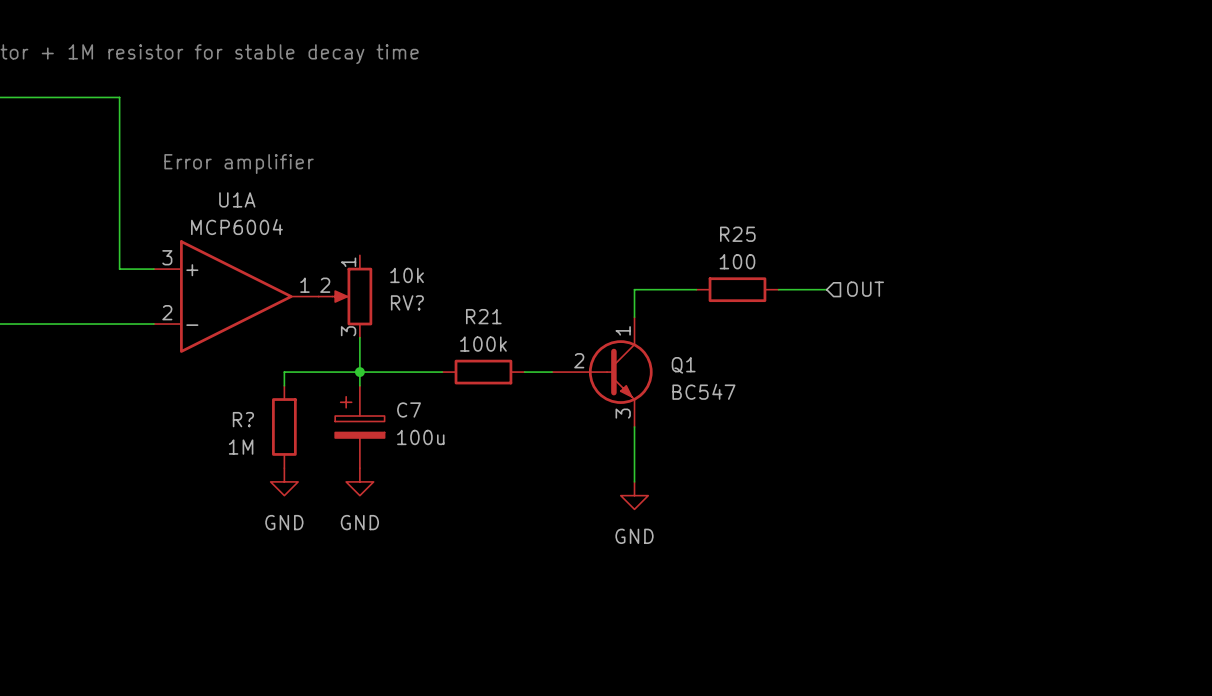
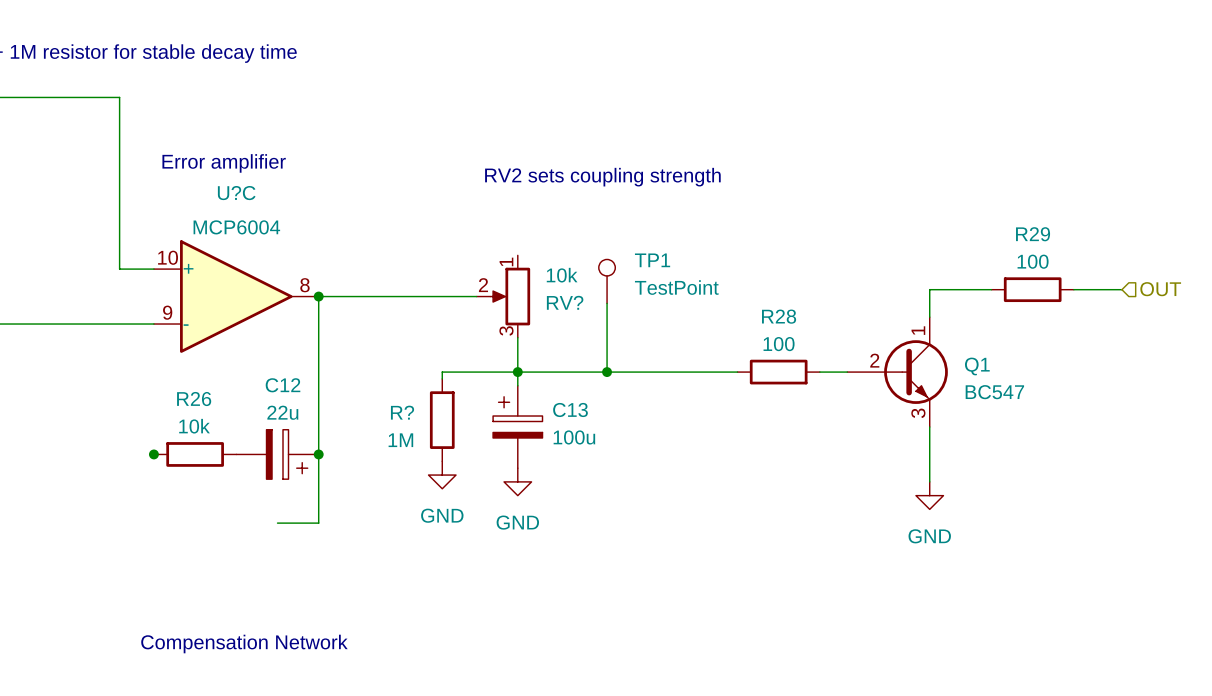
text: none -> RV2 sets coupling strength (602, 177)
U1A name: U1A (237, 199) -> U?C (236, 193)
U1A pin number: 3 (167, 257) -> 10 (168, 257)
TP1: none -> TestPoint (607, 281)
U1A pin number: 1 (304, 285) -> 8 (304, 285)
wire: (696, 289) (634, 289) (634, 317) -> none
R25: 100 (737, 289) -> none
wire: (778, 289) (826, 289) -> none
hierarchical label: OUT (865, 289) -> none
wire: none -> (991, 289) (929, 289) (929, 317)
R29: none -> 100 (1032, 289)
wire: none -> (1073, 289) (1121, 289)
hierarchical label: none -> OUT (1160, 289)
junction: none -> (318, 296)
RV? position: (345, 296) -> (503, 296)
wire: none -> (476, 296) (318, 296) (318, 523) (277, 523)
wire: none -> (607, 303) (607, 372)
U1A pin number: 2 (167, 312) -> 9 (167, 312)
wire: (359, 337) (359, 385) -> (517, 337) (517, 385)
junction: (359, 372) -> none
wire: (442, 372) (284, 372) (284, 385) -> none
R21: 100k (483, 372) -> none
junction: none -> (517, 372)
wire: none -> (524, 372) (442, 372) (442, 378)
wire: none -> (552, 372) (737, 372)
Q1 position: (602, 372) -> (897, 372)
junction: none -> (607, 372)
R28: none -> 100 (778, 372)
wire: none -> (819, 372) (847, 372)
R? position: (284, 426) -> (442, 420)
C7: 100u (359, 426) -> none
C13: none -> 100u (517, 426)
wire: (634, 426) (634, 481) -> none
wire: none -> (929, 426) (929, 481)
junction: none -> (153, 454)
R26: none -> 10k (195, 454)
C12: none -> 22u (277, 454)
junction: none -> (318, 454)
power symbol: none -> GND (442, 475)
power symbol: GND (284, 481) -> none
power symbol: GND (359, 481) -> none
power symbol: none -> GND (517, 481)
power symbol: GND (634, 495) -> none
power symbol: none -> GND (929, 495)
text: none -> Compensation Network (244, 644)

